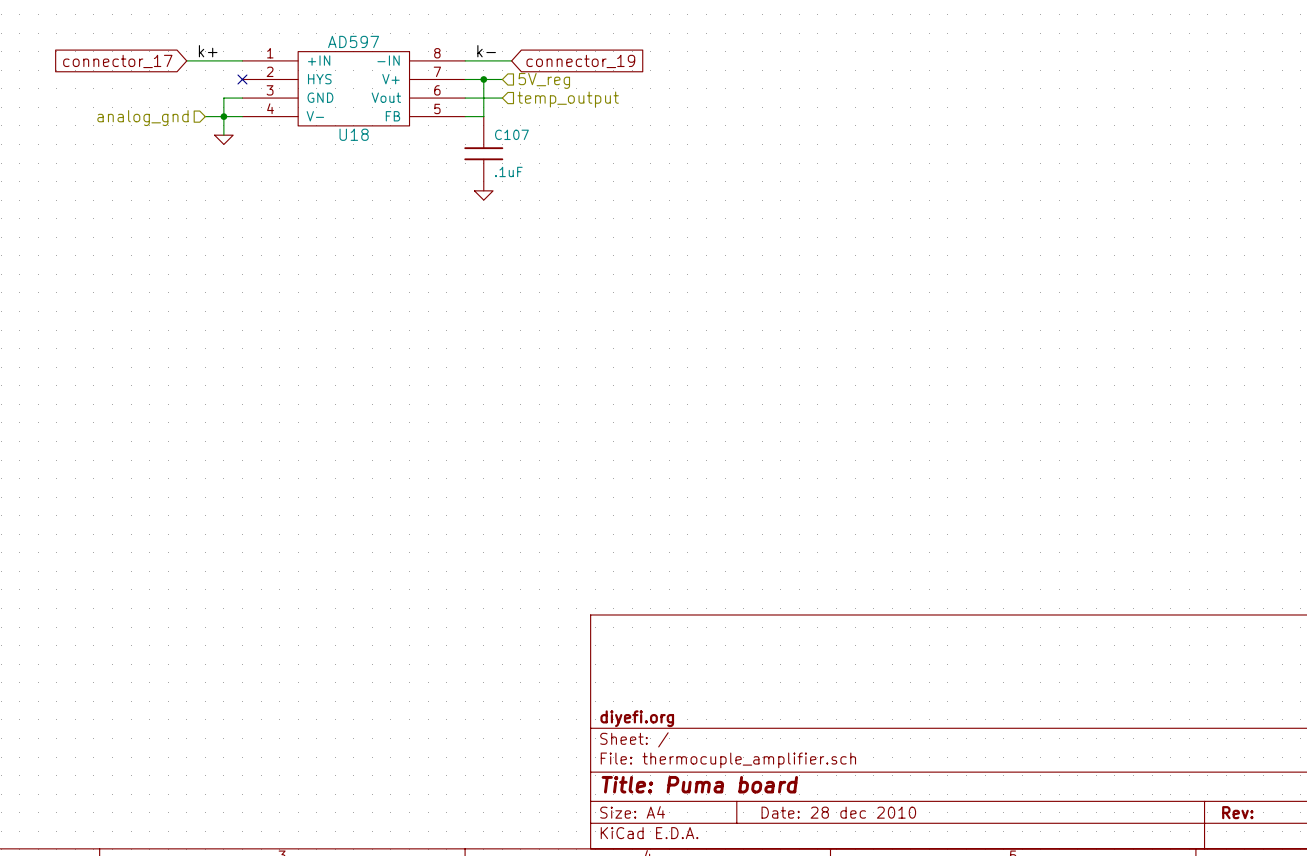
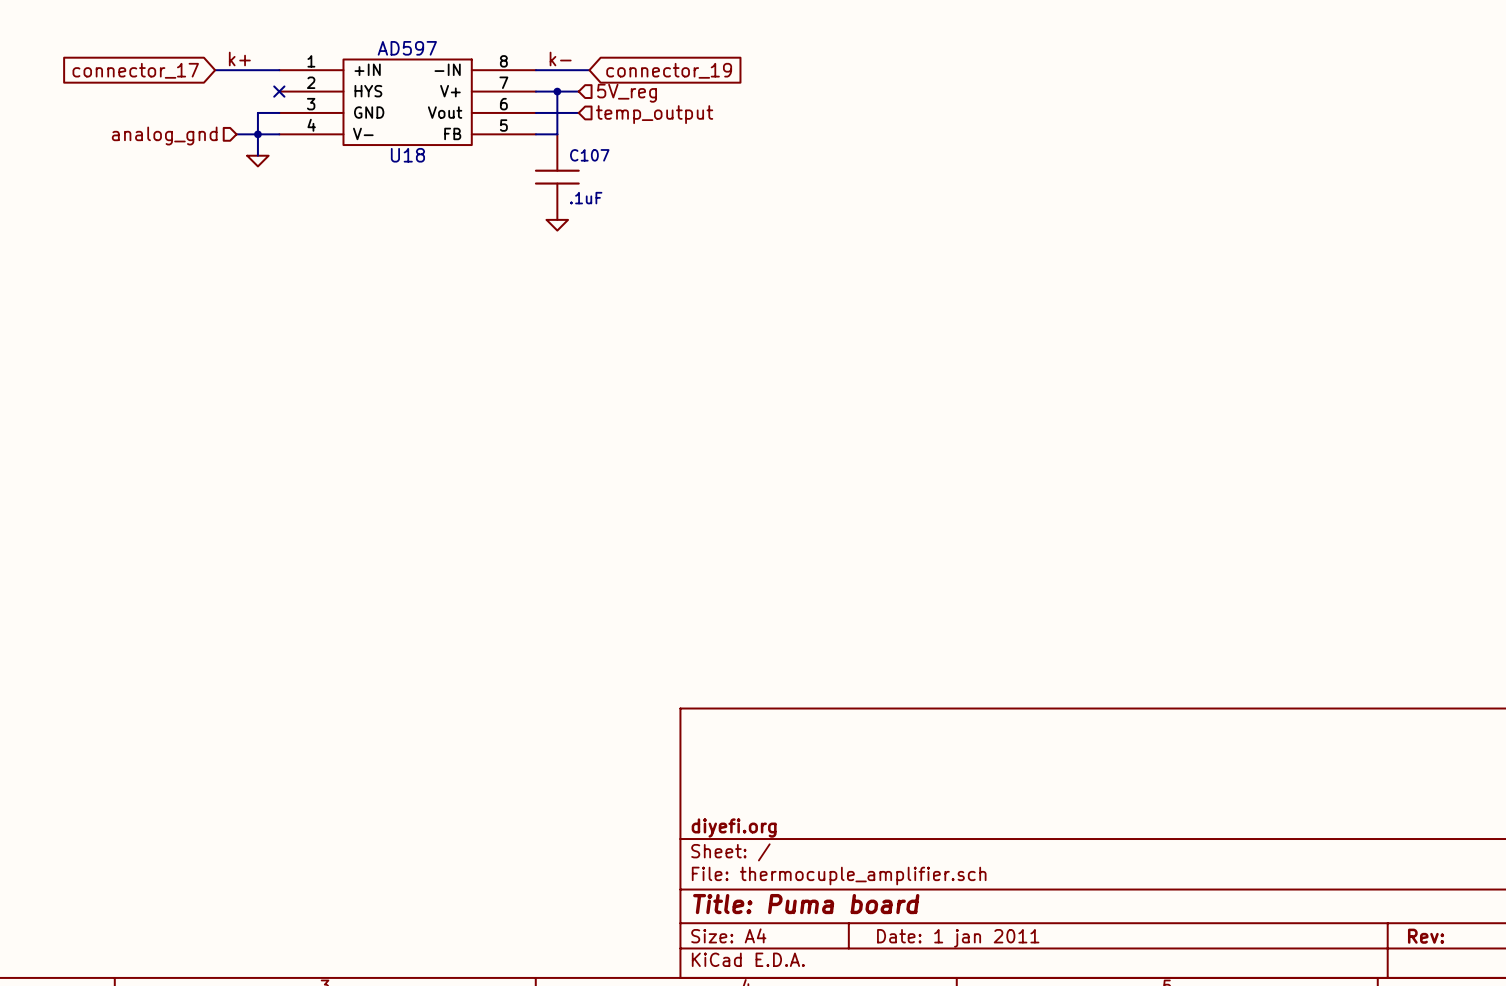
title block: Date: 28 dec 2010 (838, 812) -> Date: 1 jan 2011 (958, 938)

